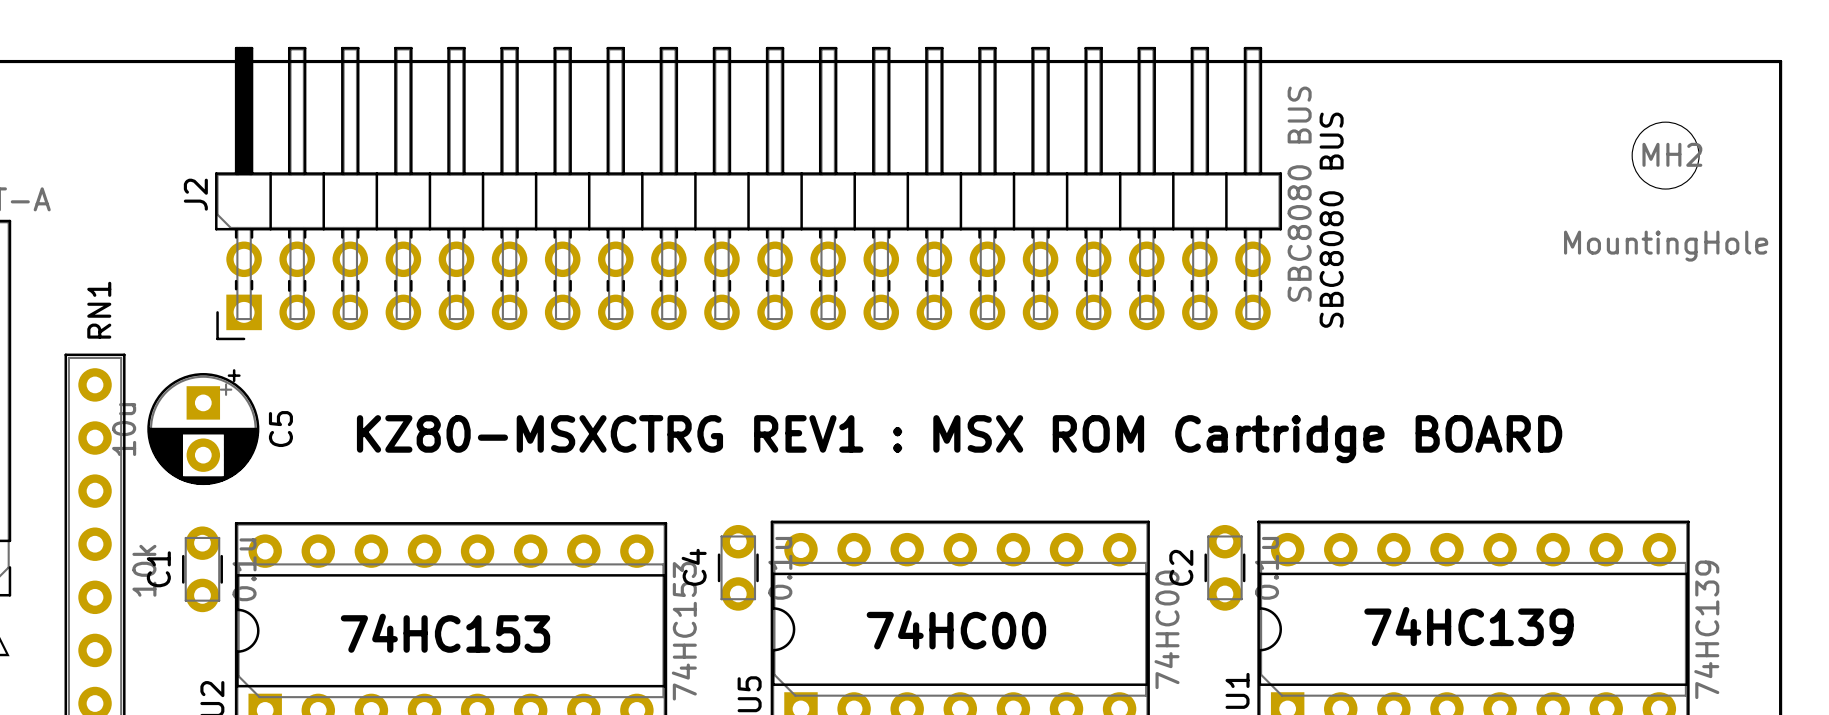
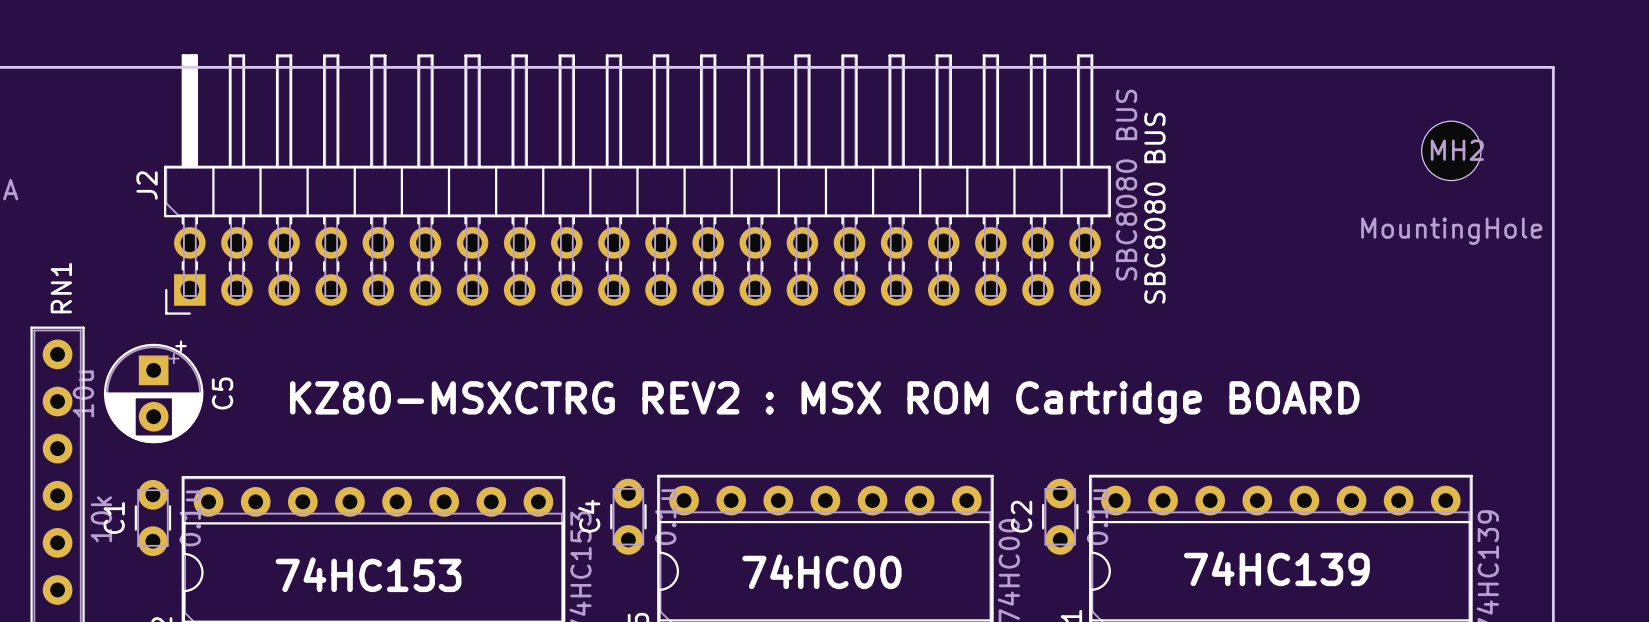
text: KZ80-MSXCTRG REV1 : MSX ROM Cartridge BOARD (959, 439) -> KZ80-MSXCTRG REV2 : MSX ROM Cartridge BOARD (824, 402)

